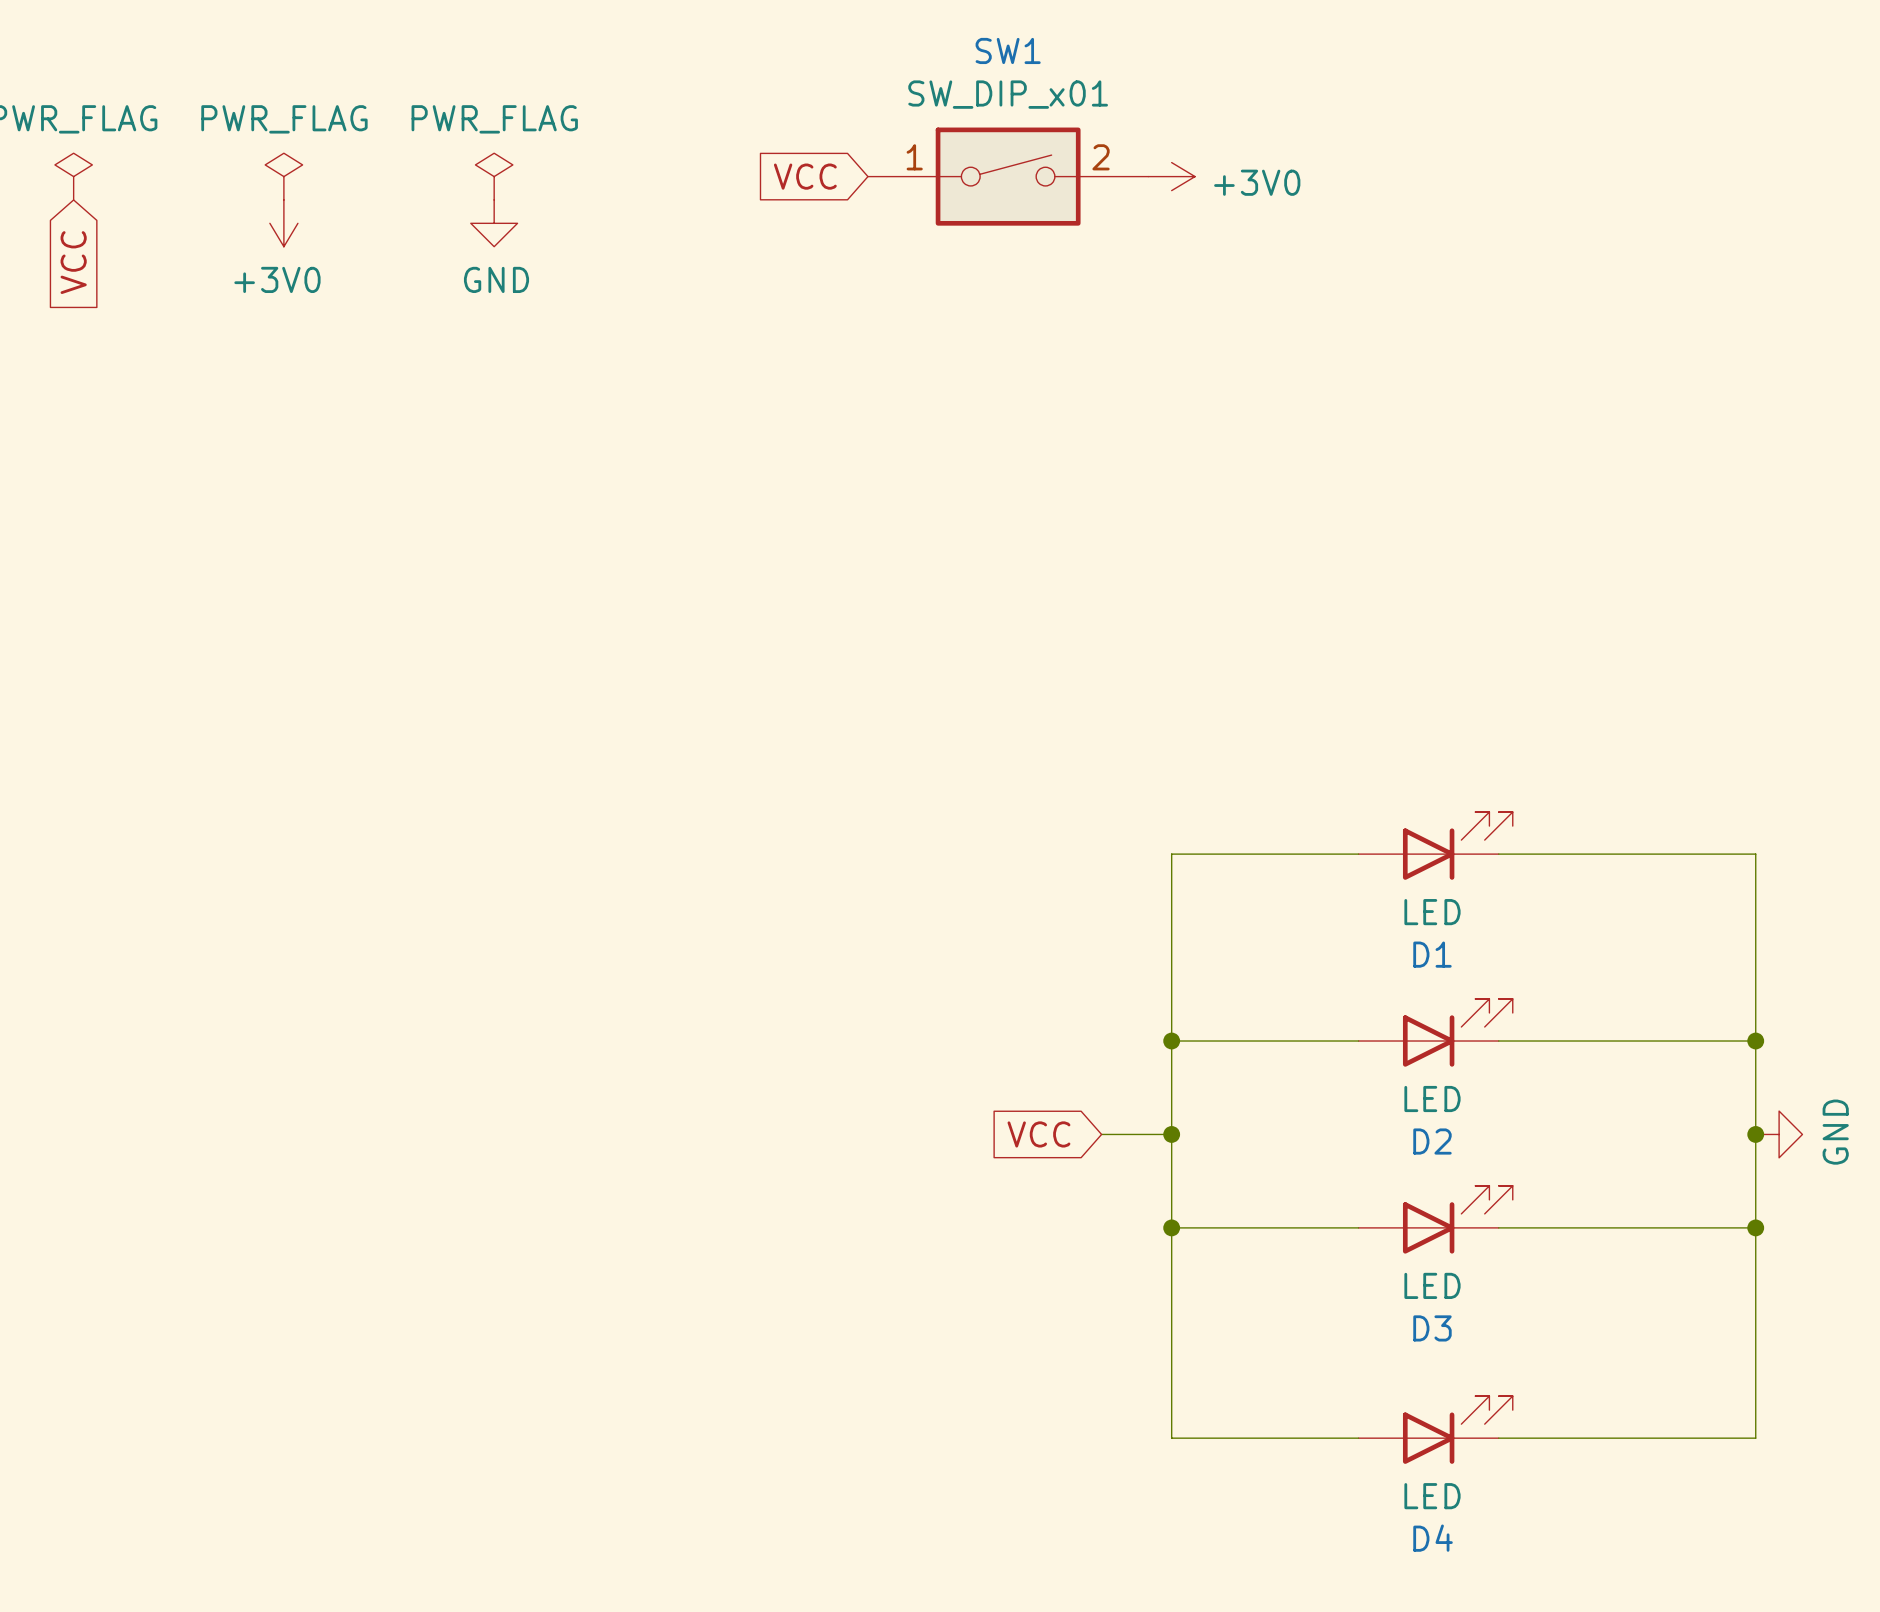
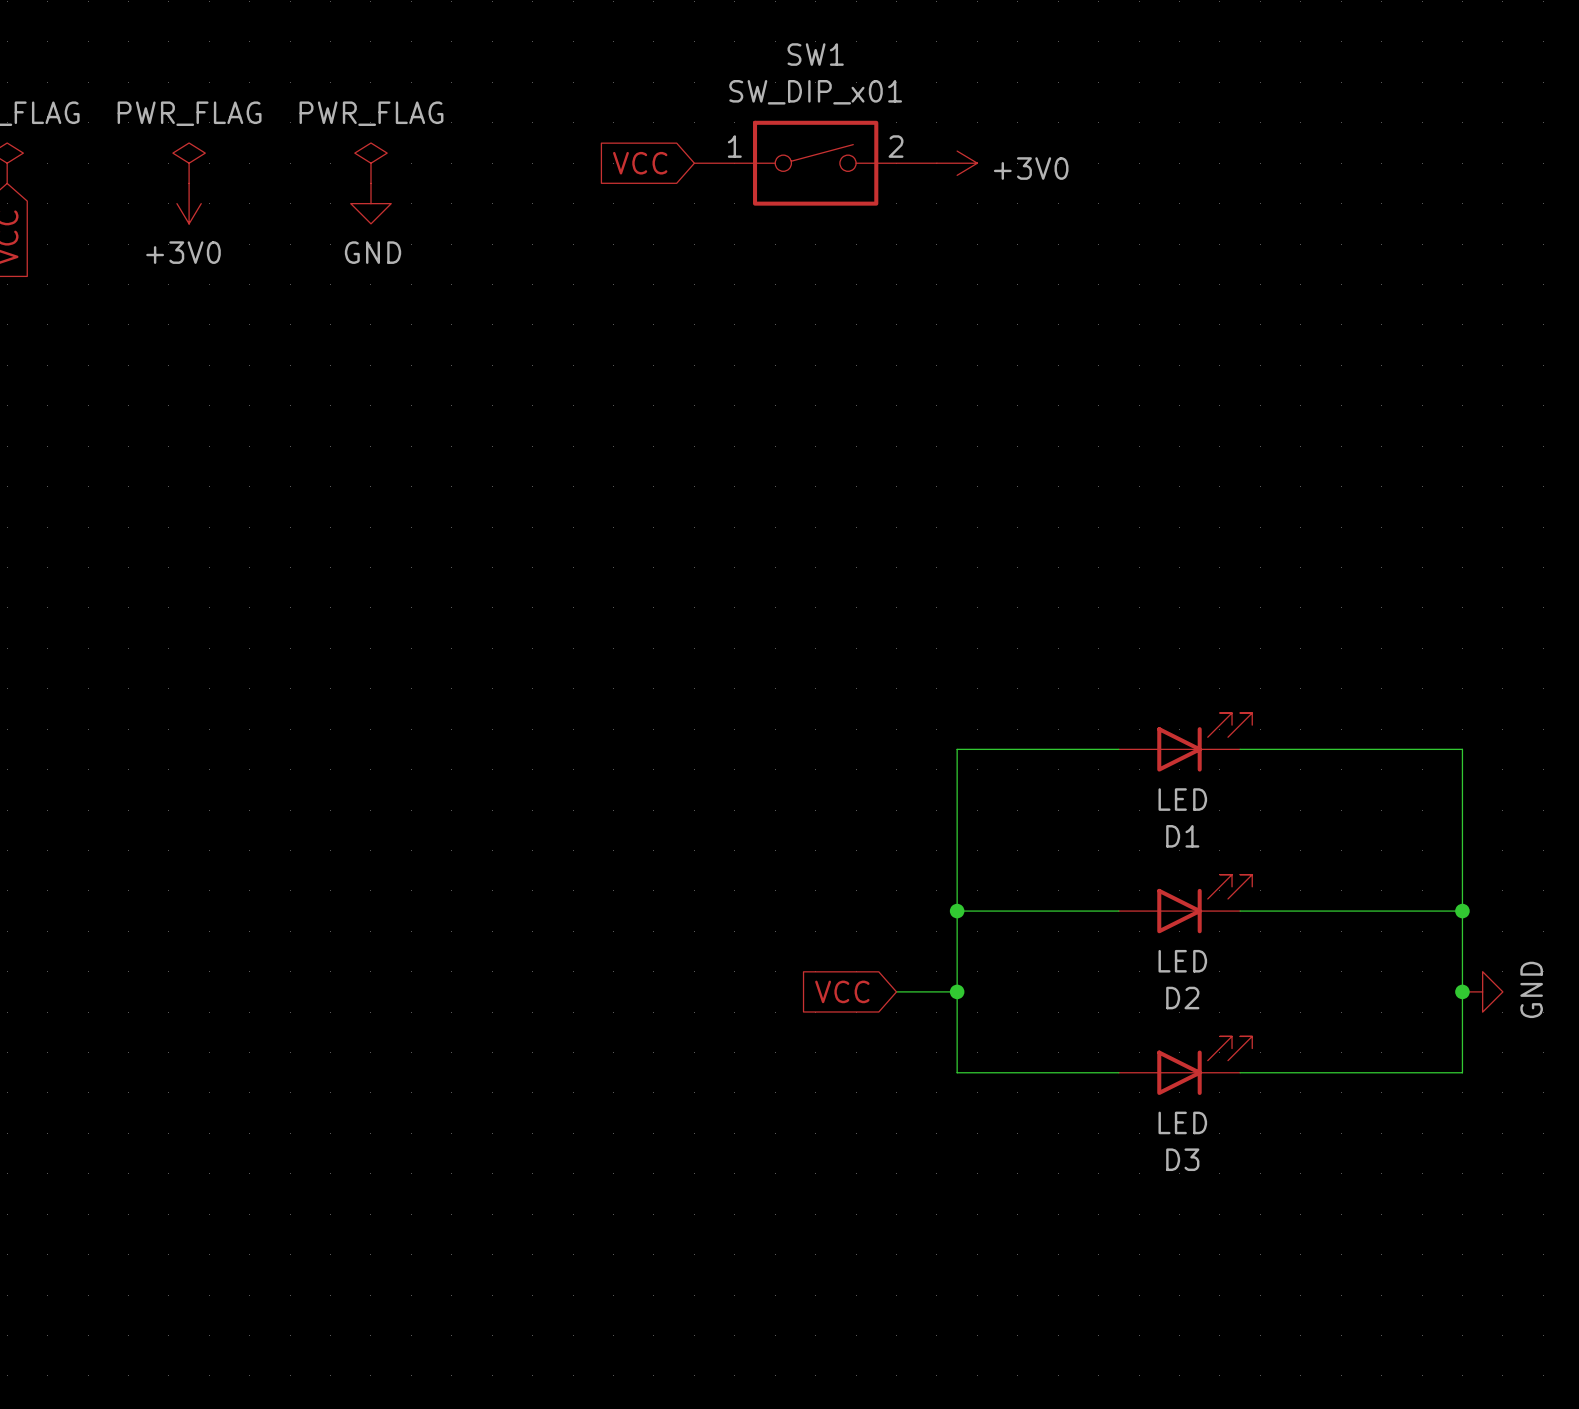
wire: (1171, 1227) (1171, 1438) (1358, 1438) -> none
junction: (1171, 1227) -> none
wire: (1755, 1227) (1755, 1438) (1498, 1438) -> none
junction: (1755, 1227) -> none
D4: LED (1435, 1429) -> none

